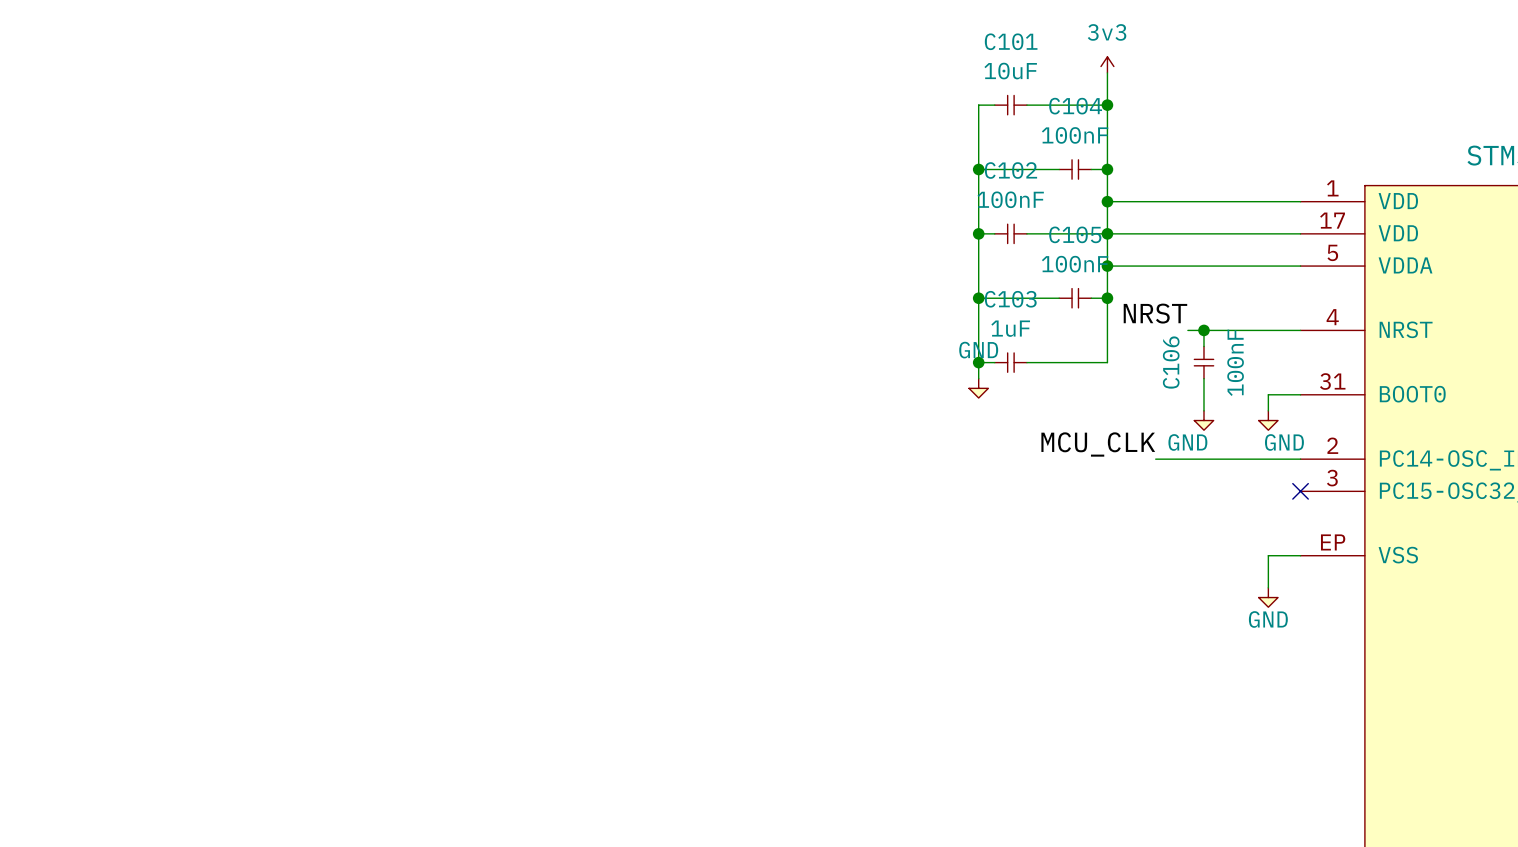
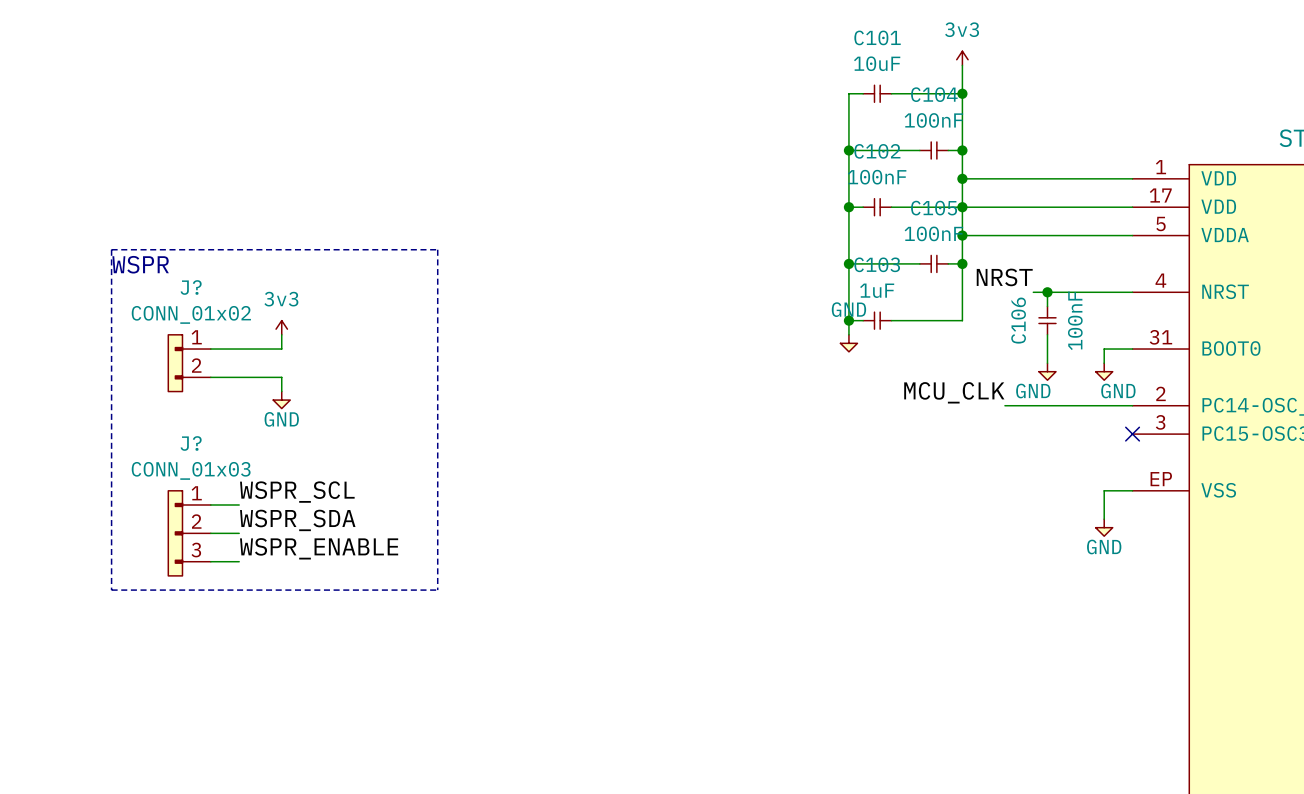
line: none -> (111, 249) (111, 590) (437, 590) (437, 249) (111, 249)
text: none -> WSPR (140, 264)
power symbol: none -> 3v3 (281, 327)
wire: none -> (281, 334) (281, 349) (210, 349)
J?: none -> CONN_01x02 (189, 363)
wire: none -> (210, 377) (281, 377) (281, 391)
power symbol: none -> GND (281, 400)
label: none -> WSPR_SCL (297, 492)
wire: none -> (210, 504) (239, 504)
label: none -> WSPR_SDA (297, 520)
J?: none -> CONN_01x03 (189, 533)
wire: none -> (210, 533) (239, 533)
label: none -> WSPR_ENABLE (319, 548)
wire: none -> (210, 561) (239, 561)

